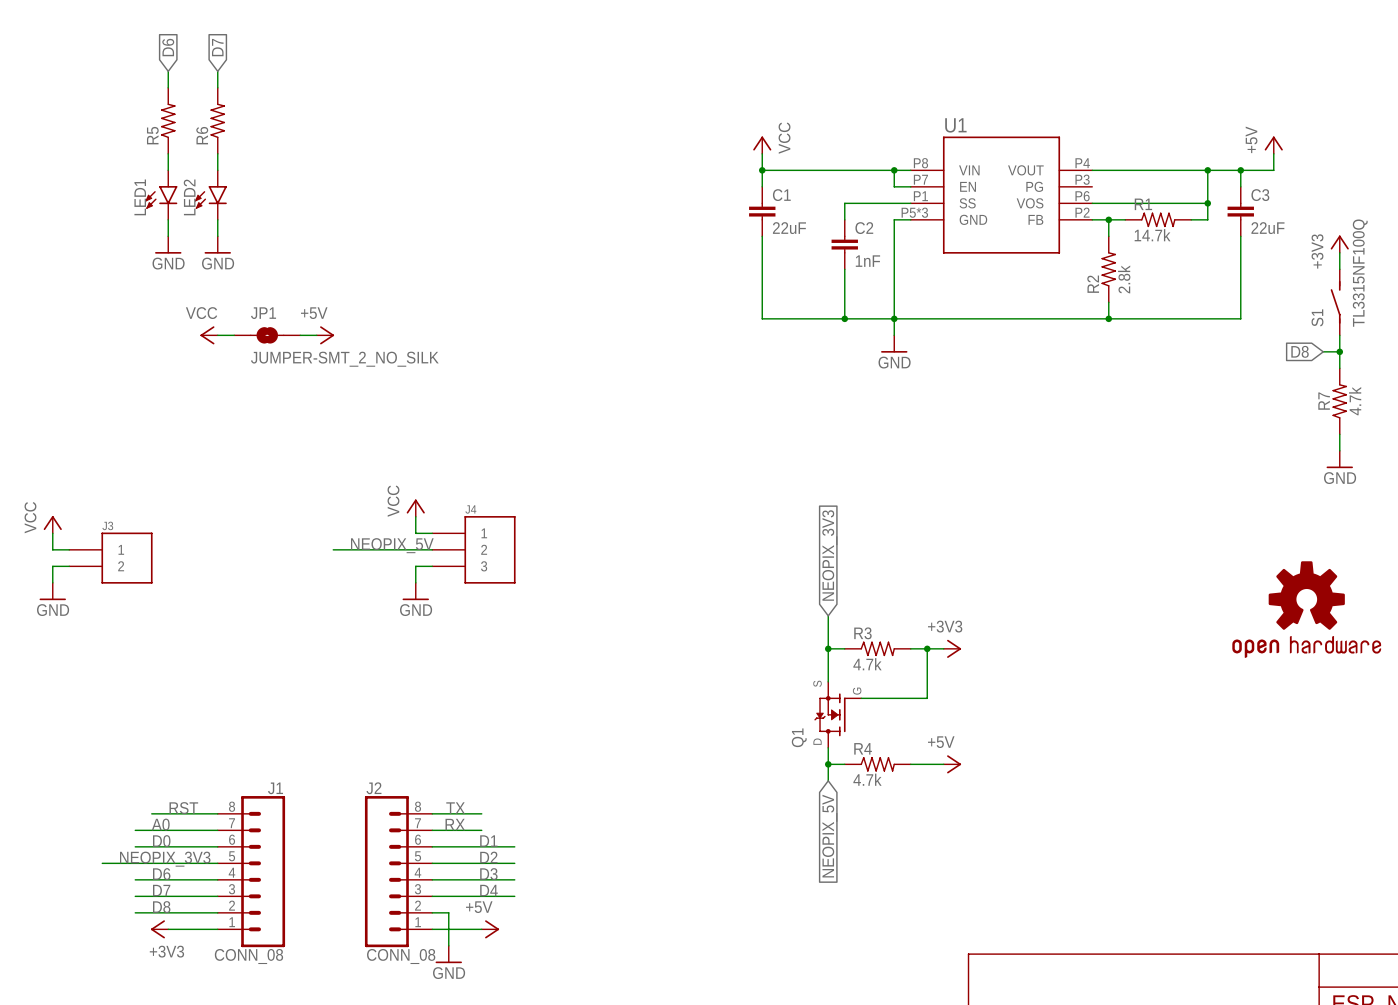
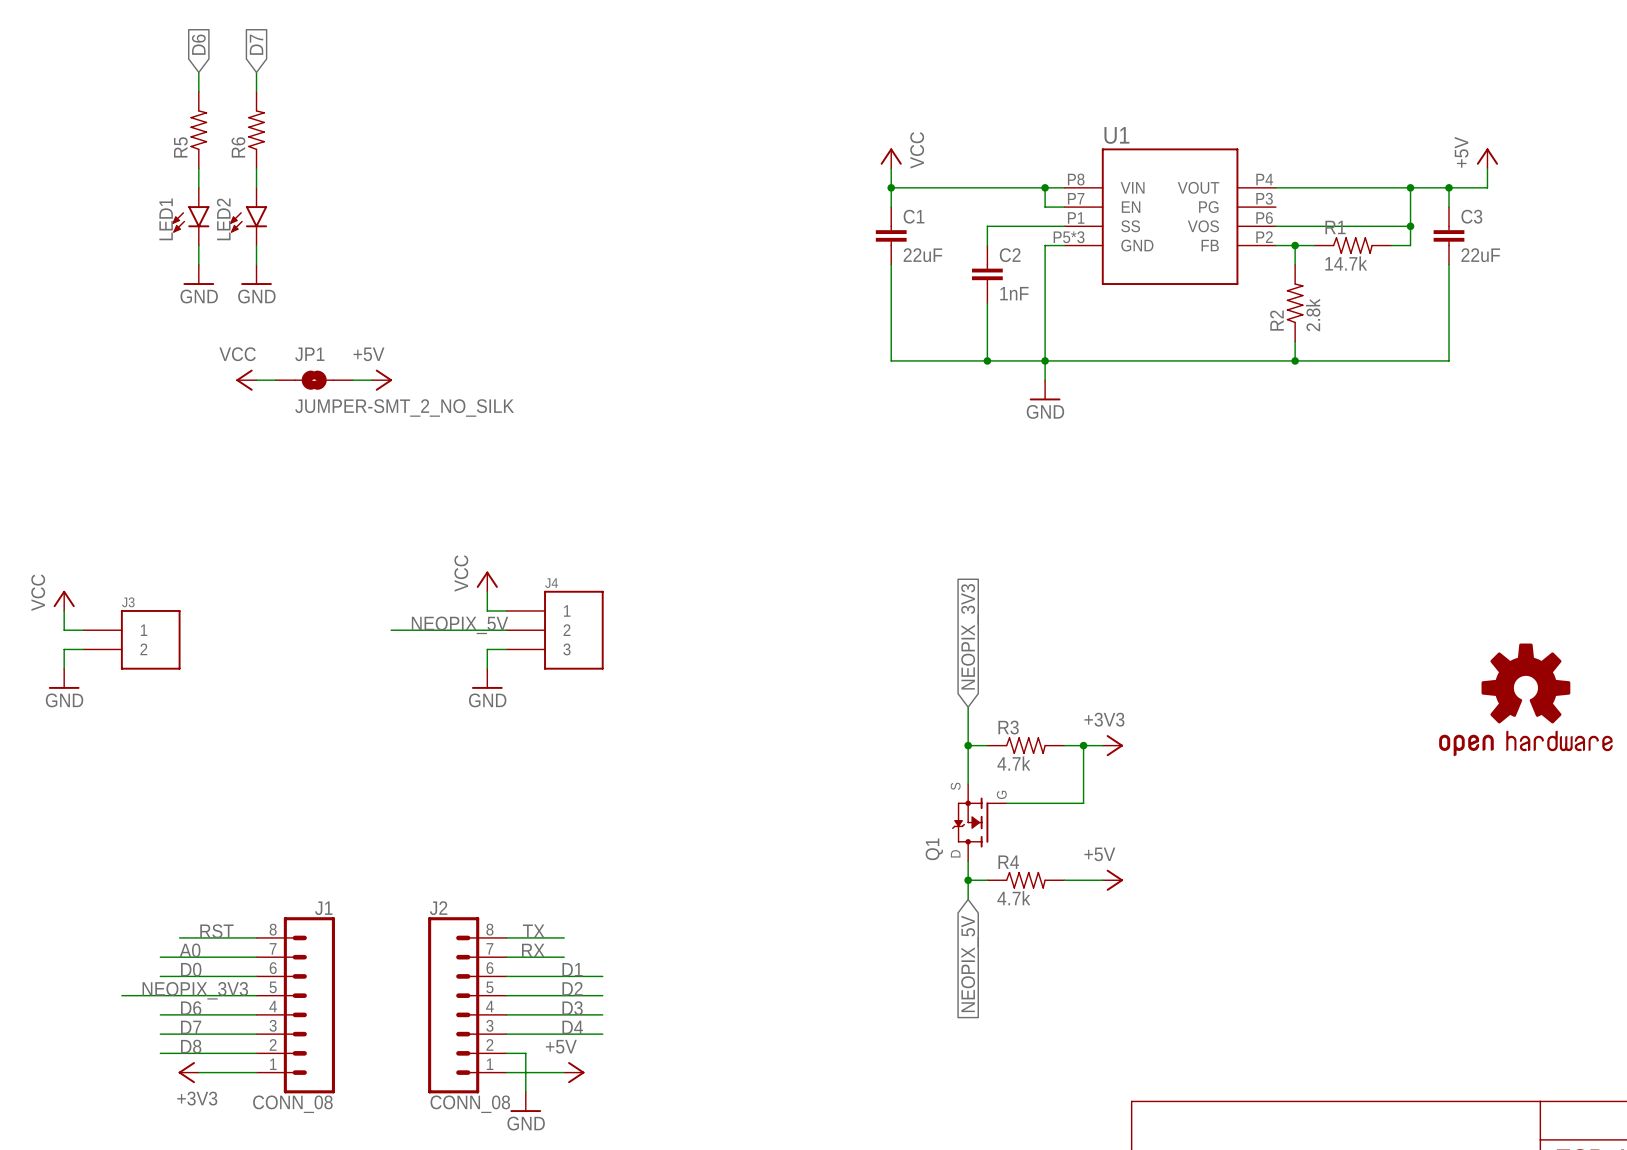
power symbol: +3V3 (1339, 244) -> none
wire: (1339, 252) (1339, 269) -> none
S1: TL3315NF100Q (1335, 302) -> none
wire: (1339, 335) (1339, 368) -> none
global label: D8 (1300, 351) -> none
wire: (1323, 351) (1339, 351) -> none
junction: (1339, 351) -> none
R7: 4.7k (1339, 401) -> none
wire: (1339, 434) (1339, 450) -> none
power symbol: GND (1339, 459) -> none

